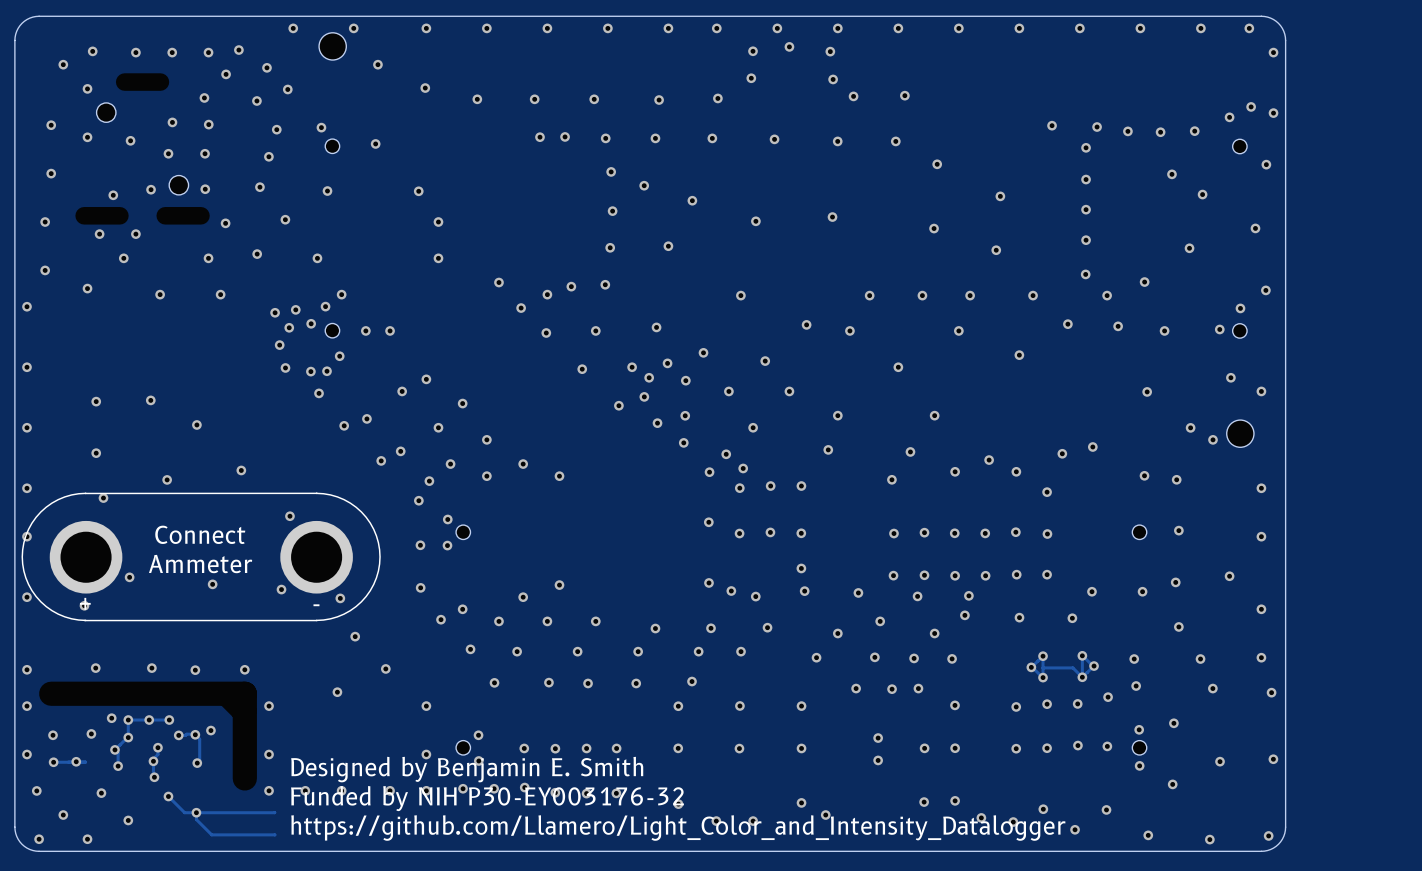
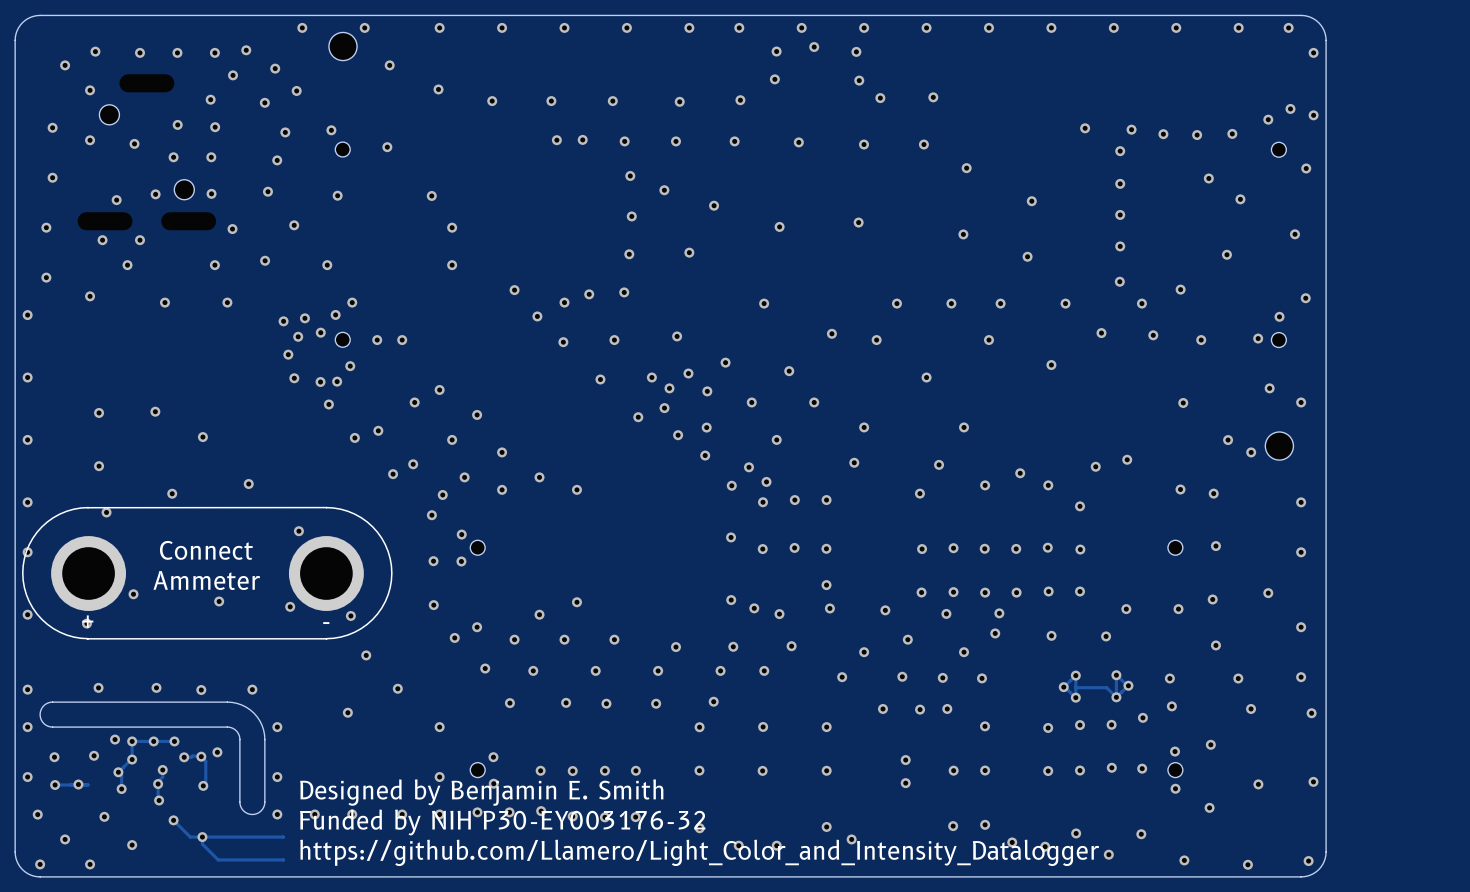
board edge: none -> (227, 702) (50, 702) (42, 707) (40, 716) (43, 723) (52, 727) (232, 728) (237, 731) (239, 737) (240, 805) (246, 812) (255, 814) (262, 809) (264, 803) (263, 729) (257, 716) (250, 709) (241, 704) (227, 702)
part: (148, 736) -> none

